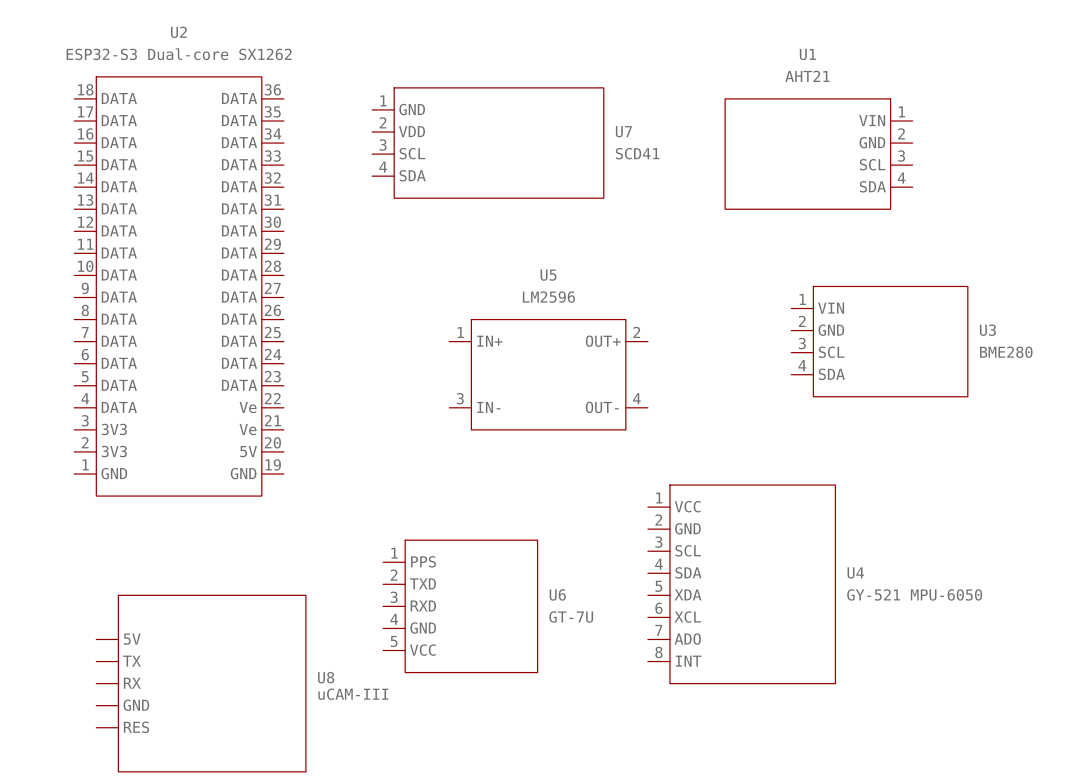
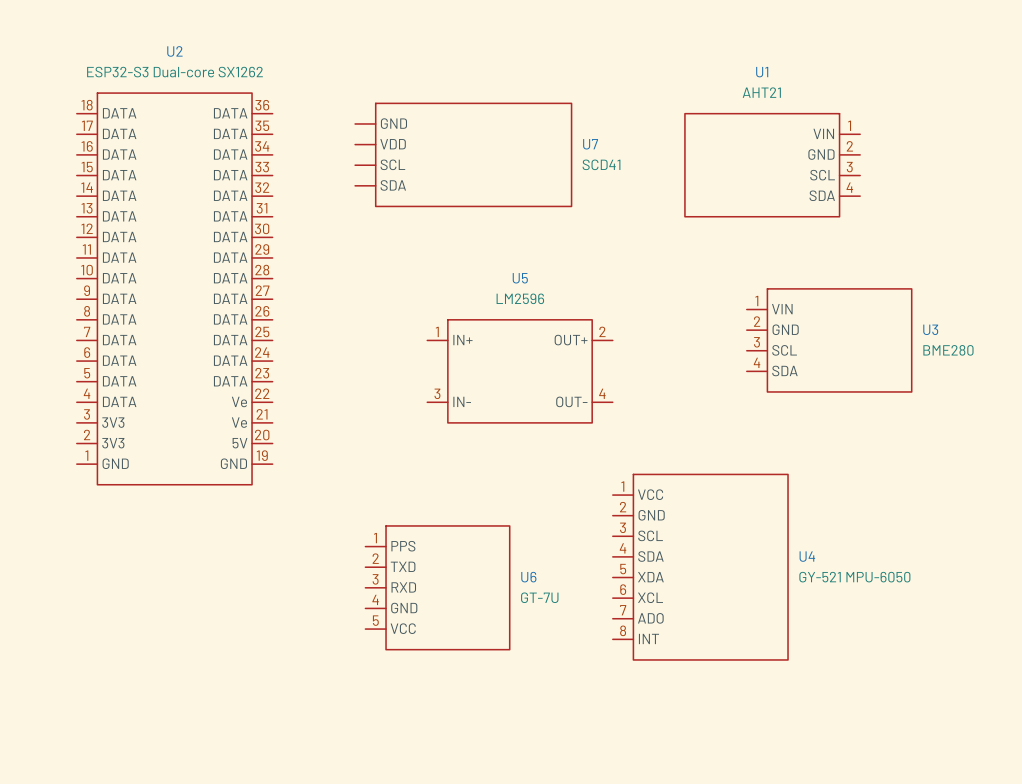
U7 pin number: 1 (383, 100) -> none
U7 pin number: 2 (383, 122) -> none
U7 pin number: 3 (383, 144) -> none
U7 pin number: 4 (383, 167) -> none
U8: uCAM-III (201, 683) -> none

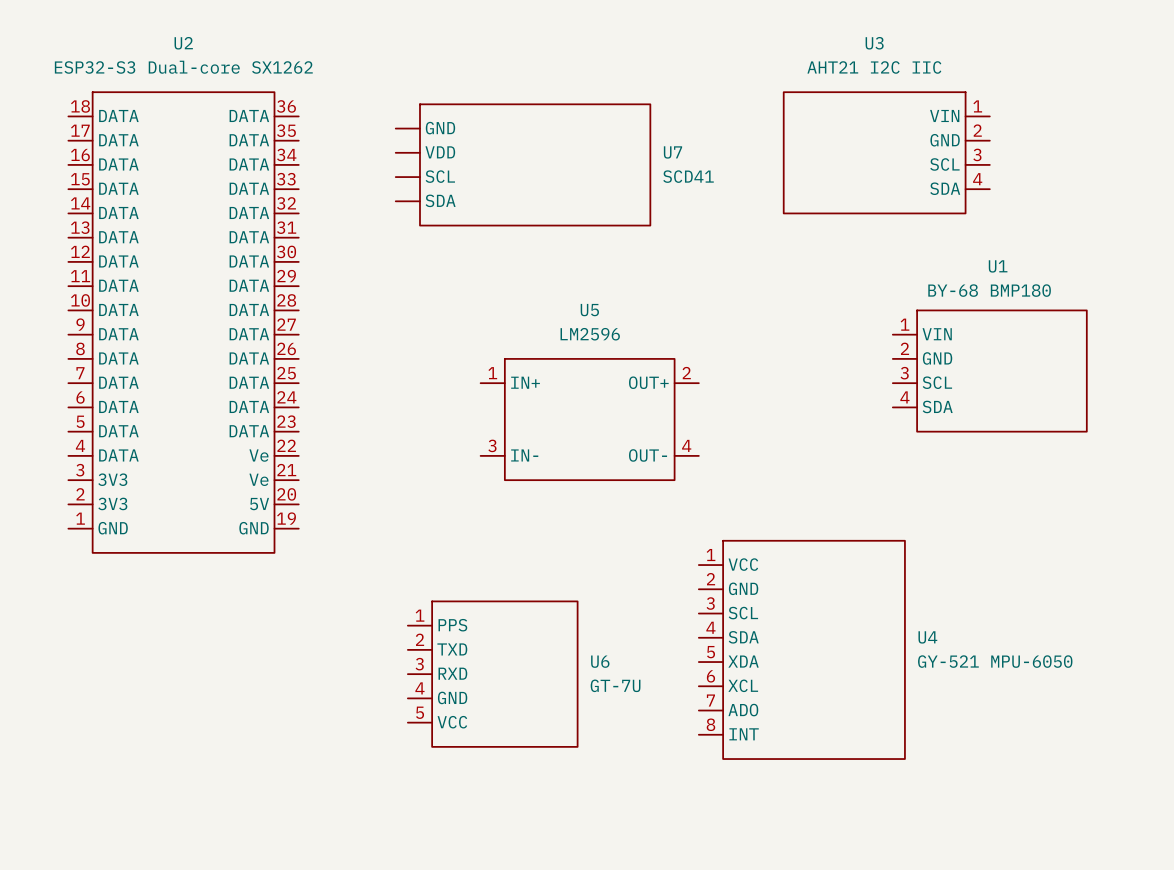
U1 name position: U1 (762, 72) -> U1 (998, 266)
U1 value: AHT21 (761, 92) -> BY-68 BMP180 (989, 290)
U1 symbol: [684, 113, 861, 217] -> [892, 310, 1087, 432]
U3 symbol: [746, 288, 912, 392] -> [783, 92, 990, 214]
U3 name position: U3 (930, 329) -> U3 (874, 43)
U3 value: BME280 (948, 350) -> AHT21 I2C IIC (874, 67)

